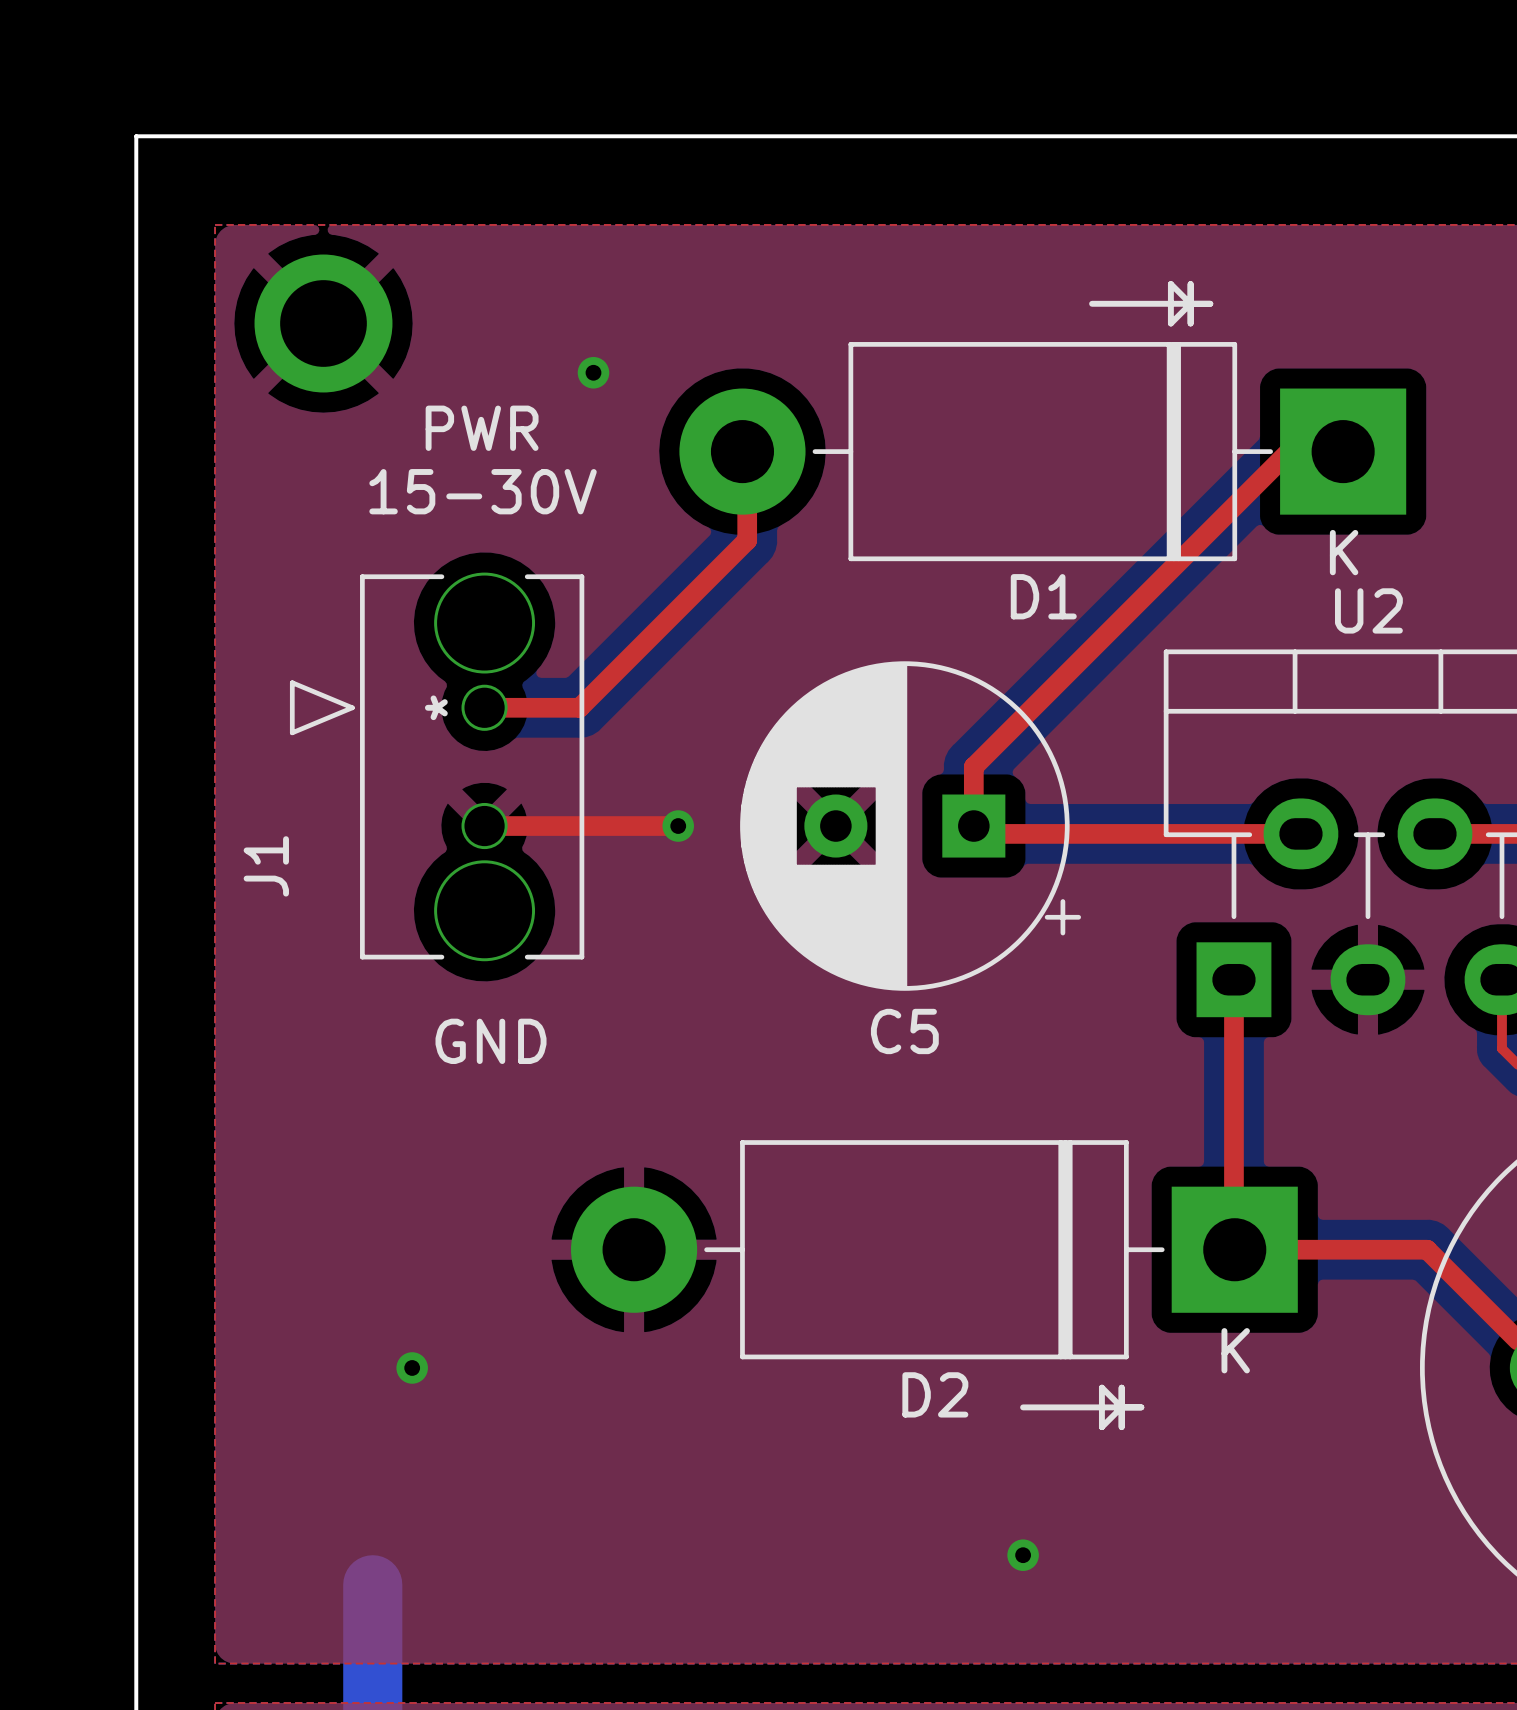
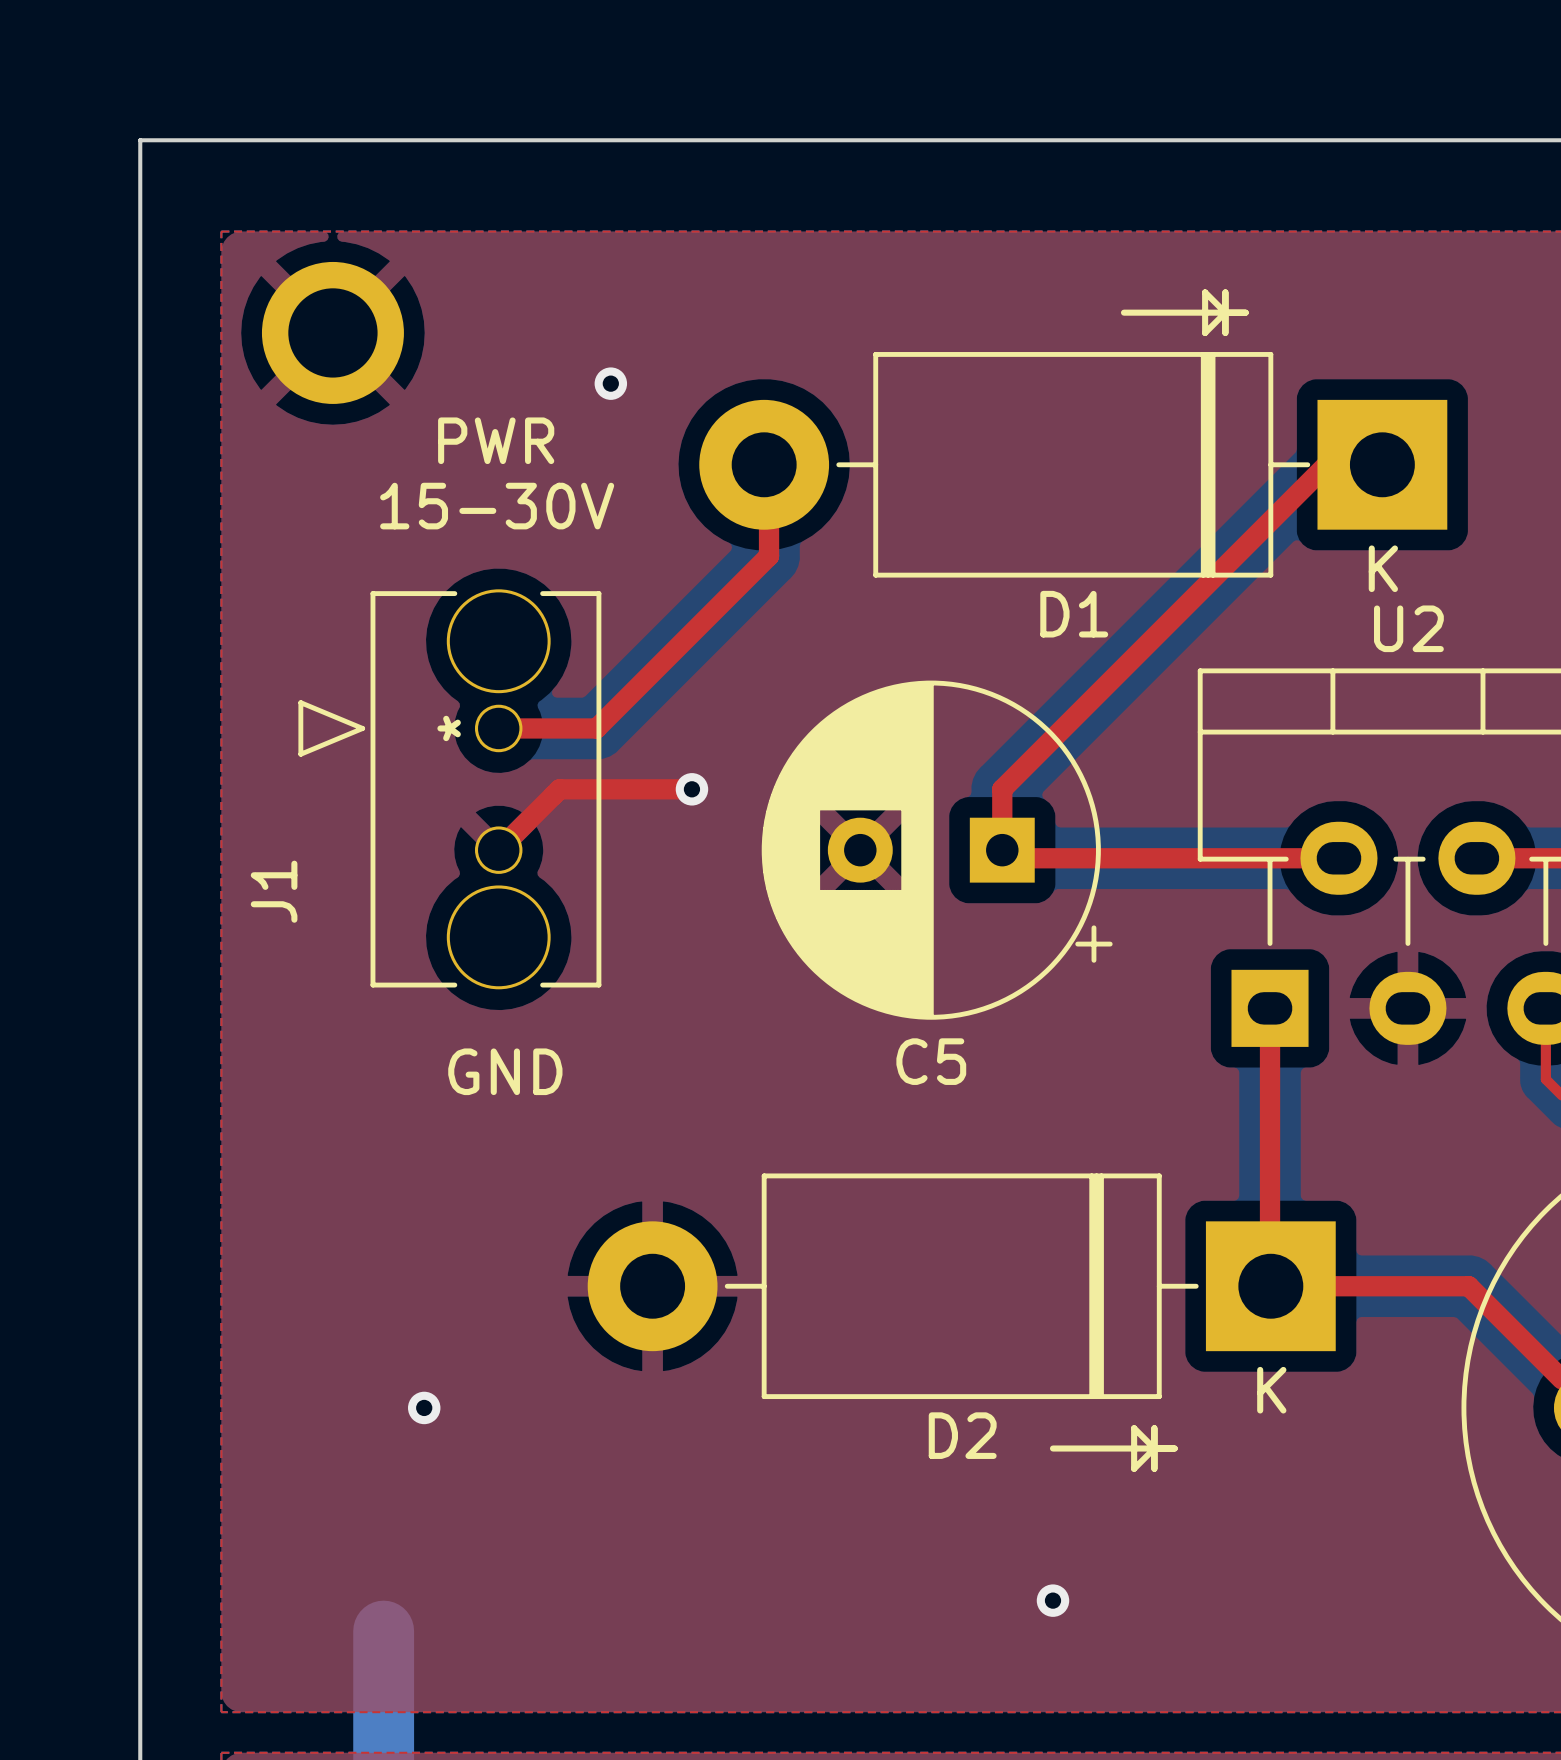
top track: (484, 826) (678, 826) -> (498, 850) (559, 789) (691, 789)
via position: (678, 826) -> (691, 789)

